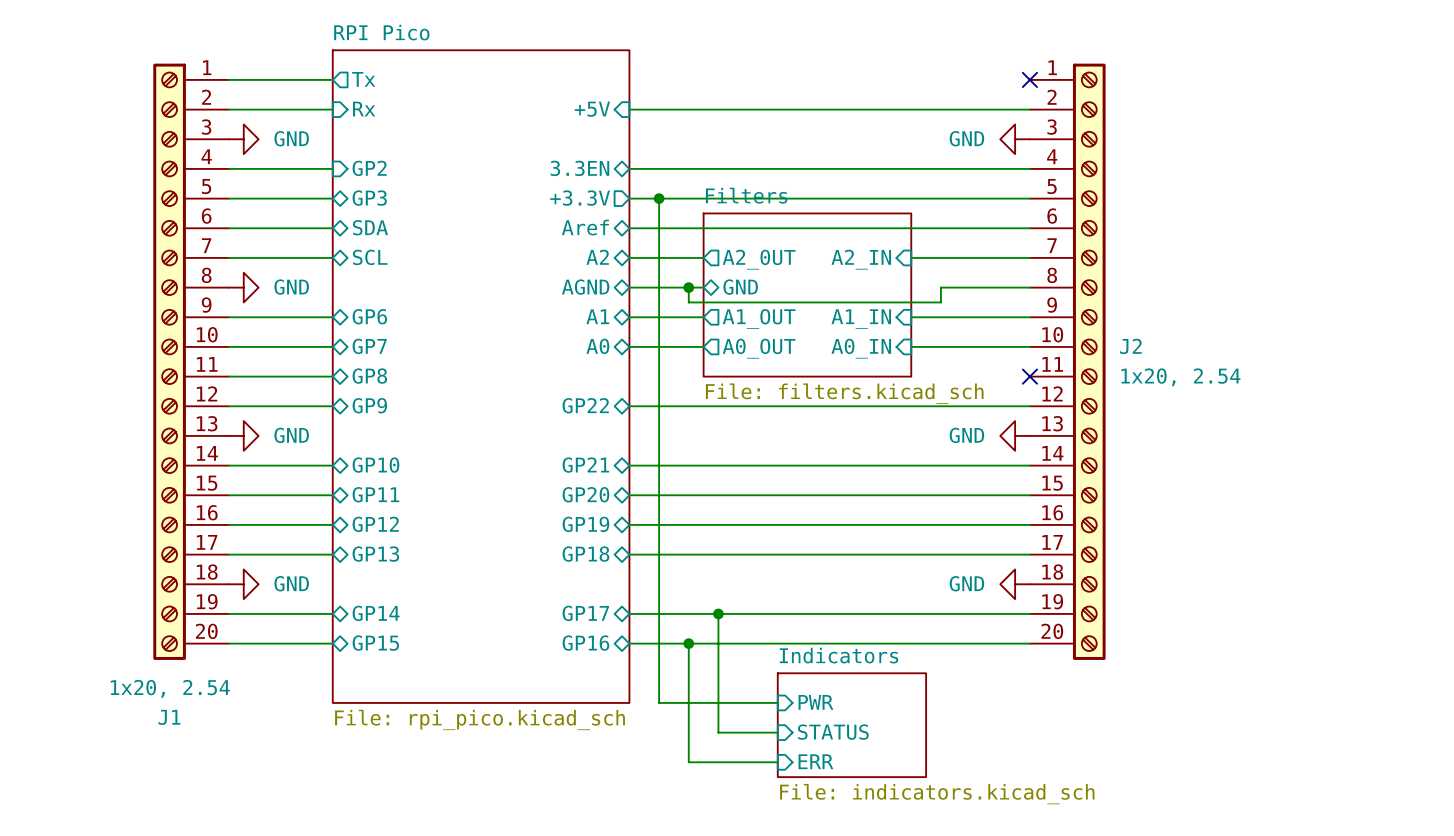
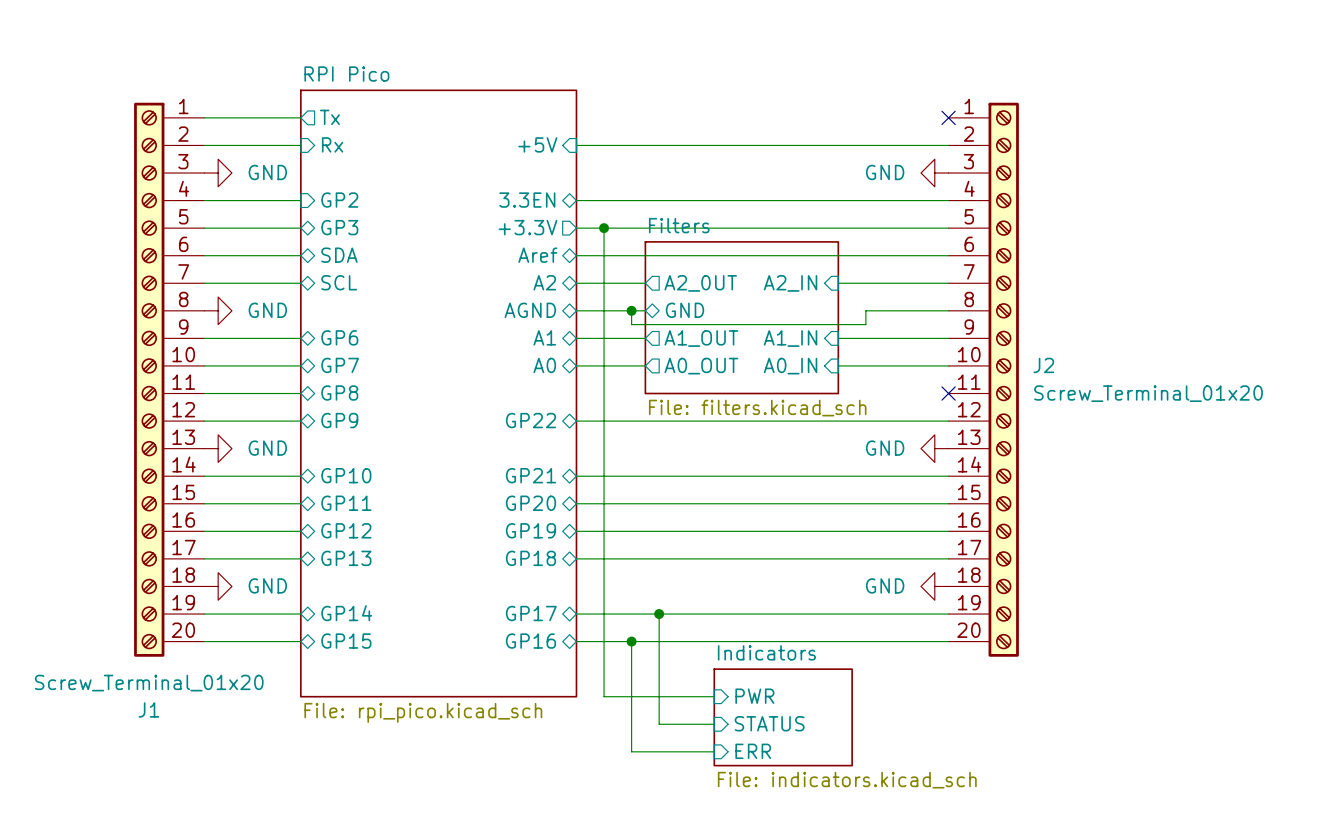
J2 value: 1x20, 2.54 (1180, 377) -> Screw_Terminal_01x20 (1148, 393)
J1 value: 1x20, 2.54 (170, 688) -> Screw_Terminal_01x20 (149, 683)

